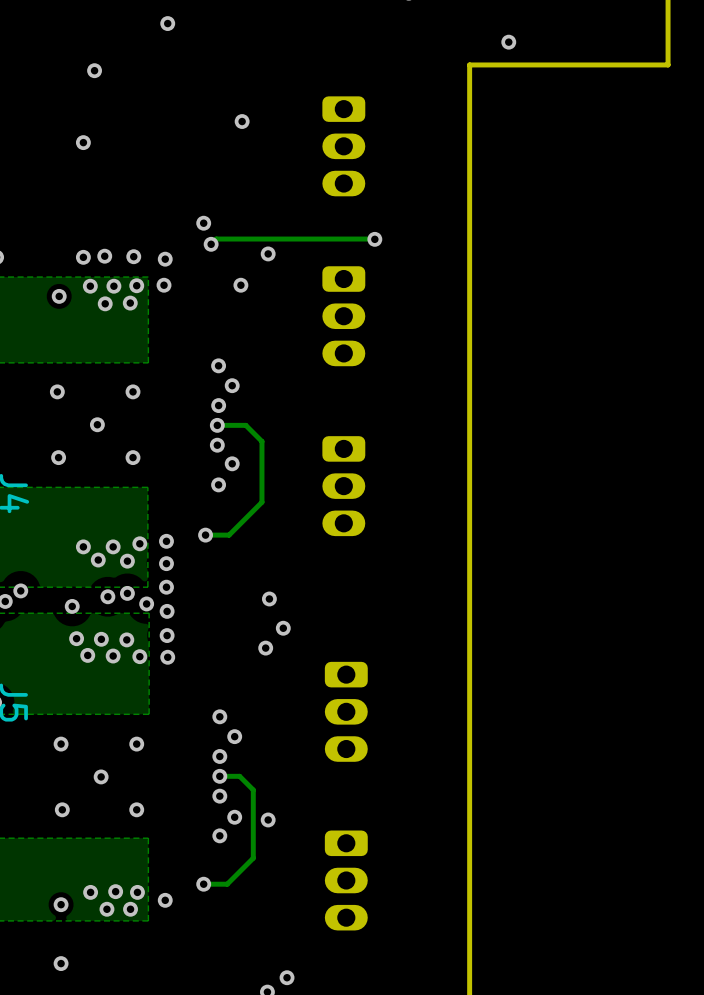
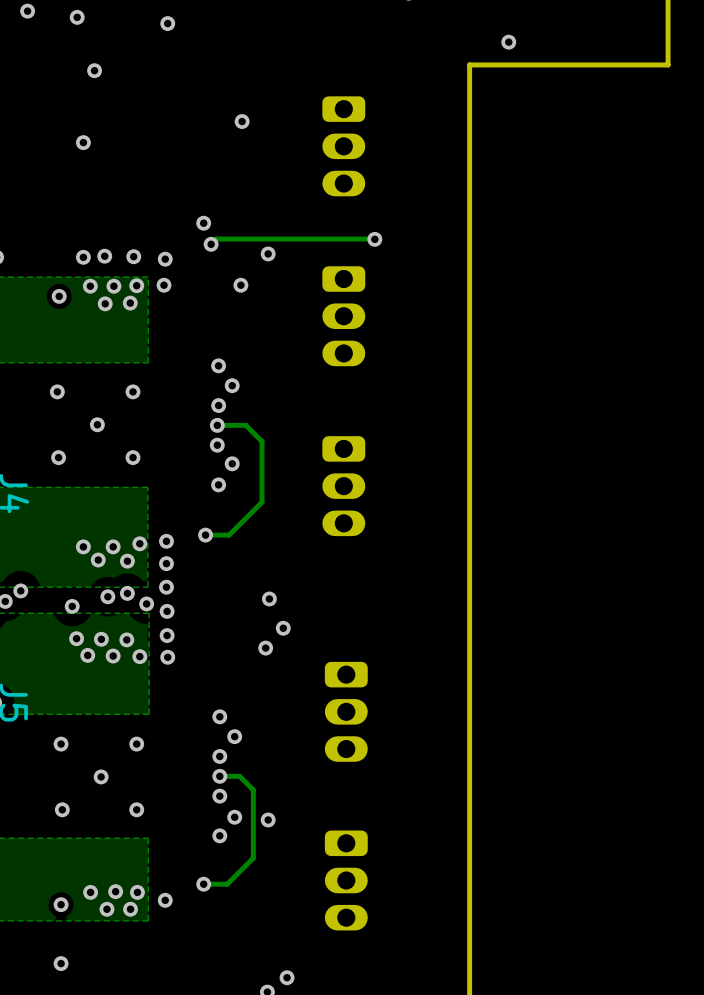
via: none -> (27, 11)
via: none -> (77, 17)

